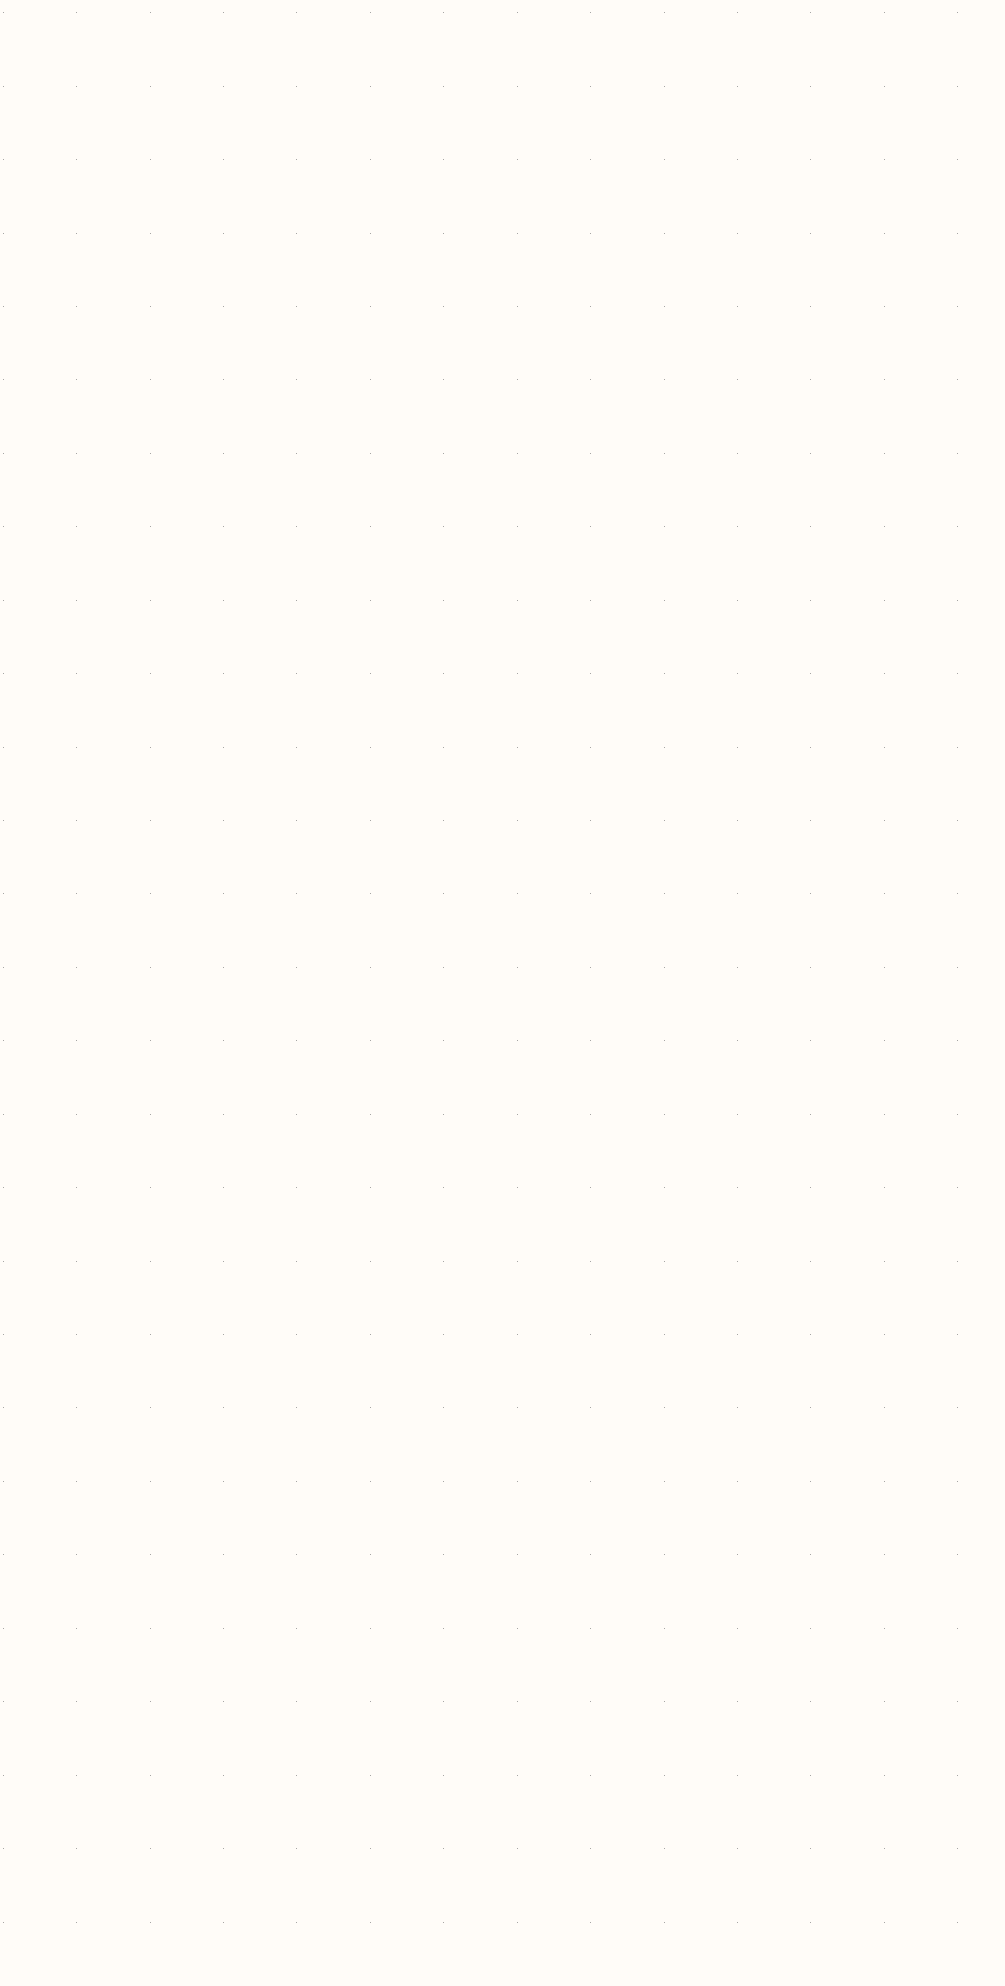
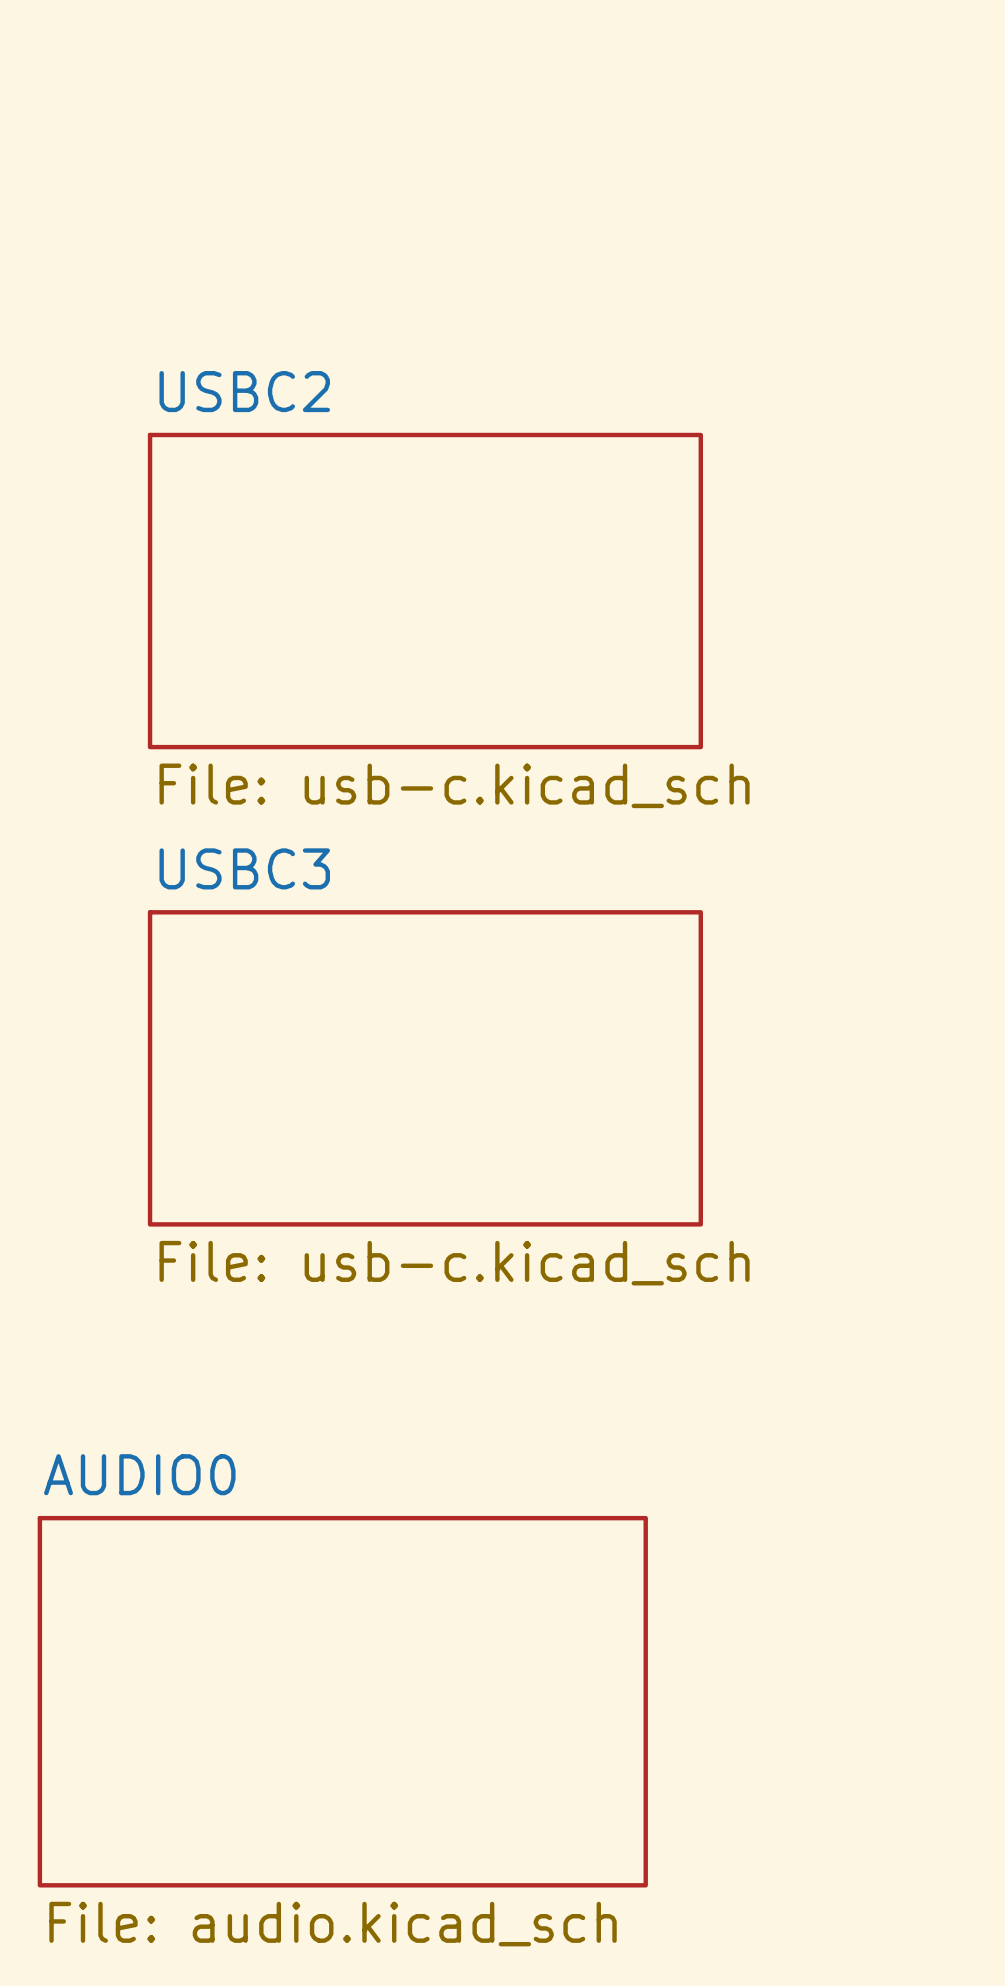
sheet USBC2: none -> File: usb-c.kicad_sch (425, 591)
sheet USBC3: none -> File: usb-c.kicad_sch (425, 1068)
sheet AUDIO0: none -> File: audio.kicad_sch (342, 1701)

